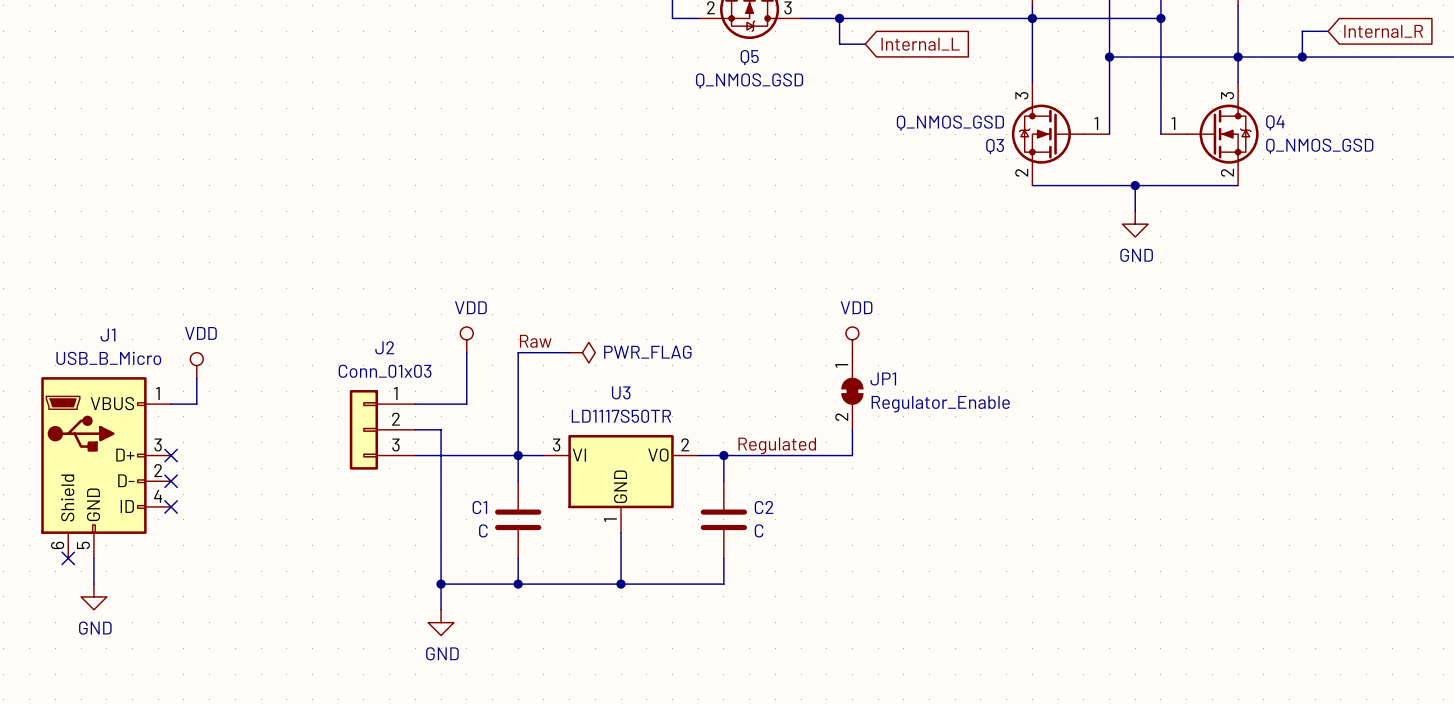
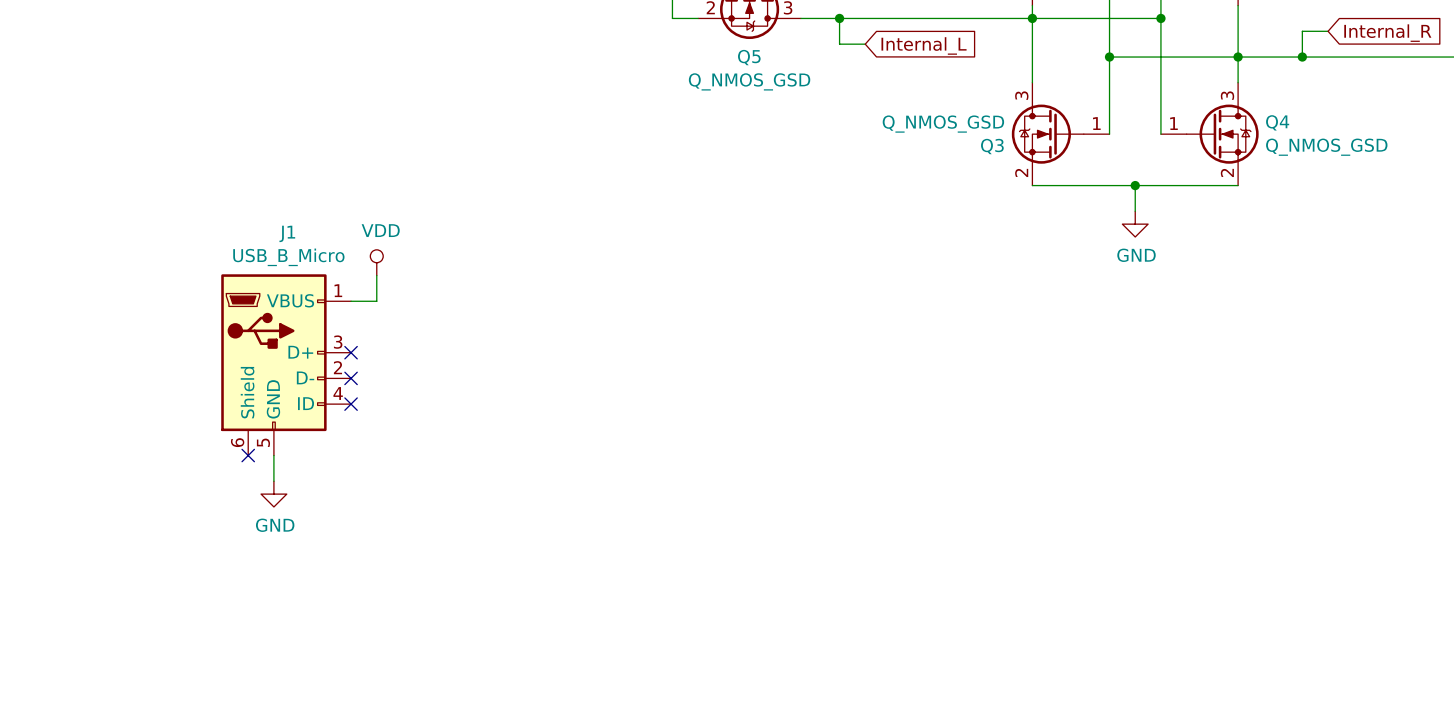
power symbol: none -> VDD (376, 262)
power symbol: VDD (466, 339) -> none
power symbol: VDD (852, 339) -> none
label: Raw (535, 341) -> none
no-connect mark: none -> (351, 352)
wire: (466, 352) (466, 404) (415, 404) -> none
wire: (569, 352) (518, 352) (518, 481) -> none
power symbol: PWR_FLAG (582, 352) -> none
power symbol: VDD (196, 365) -> none
wire: (196, 378) (196, 404) (171, 404) -> (376, 275) (376, 301) (351, 301)
no-connect mark: none -> (351, 378)
JP1: Regulator_Enable (852, 391) -> none
no-connect mark: none -> (351, 404)
J2: Conn_01x03 (382, 429) -> none
wire: (415, 429) (441, 429) (441, 609) -> none
wire: (852, 429) (852, 455) (698, 455) -> none
label: Regulated (777, 445) -> none
no-connect mark: (171, 455) -> none
no-connect mark: none -> (248, 455)
wire: (415, 455) (543, 455) -> none
junction: (518, 455) -> none
wire: (723, 455) (723, 481) -> none
junction: (723, 455) -> none
J1 position: (106, 467) -> (286, 364)
no-connect mark: (171, 481) -> none
U3: LD1117S50TR (621, 483) -> none
power symbol: none -> GND (273, 494)
no-connect mark: (171, 506) -> none
C1: C (518, 519) -> none
C2: C (723, 519) -> none
wire: (621, 532) (621, 584) -> none
no-connect mark: (68, 558) -> none
wire: (93, 558) (93, 584) -> (273, 455) (273, 481)
wire: (518, 558) (518, 584) -> none
wire: (723, 558) (723, 584) (441, 584) -> none
junction: (441, 584) -> none
junction: (518, 584) -> none
junction: (621, 584) -> none
power symbol: GND (93, 596) -> none
power symbol: GND (441, 622) -> none

